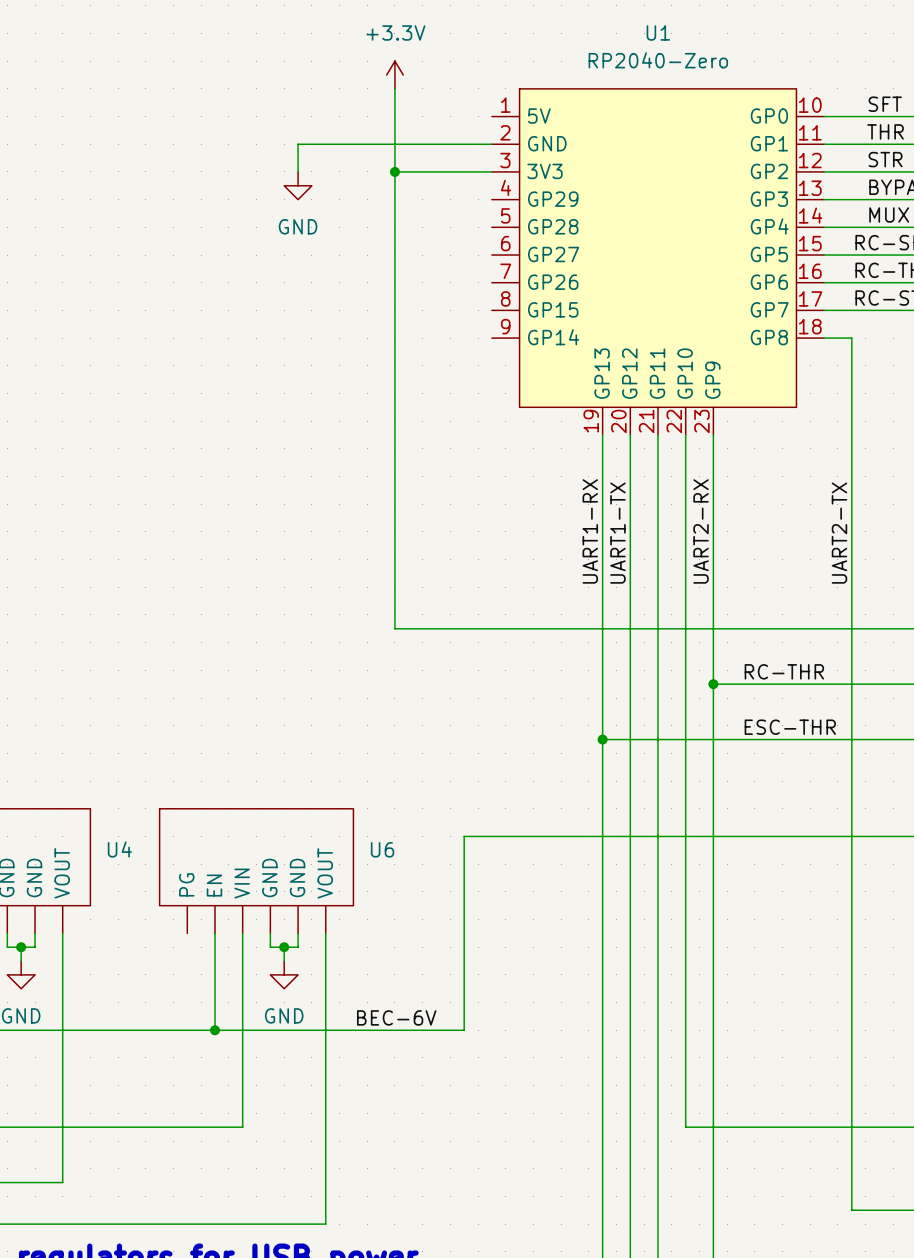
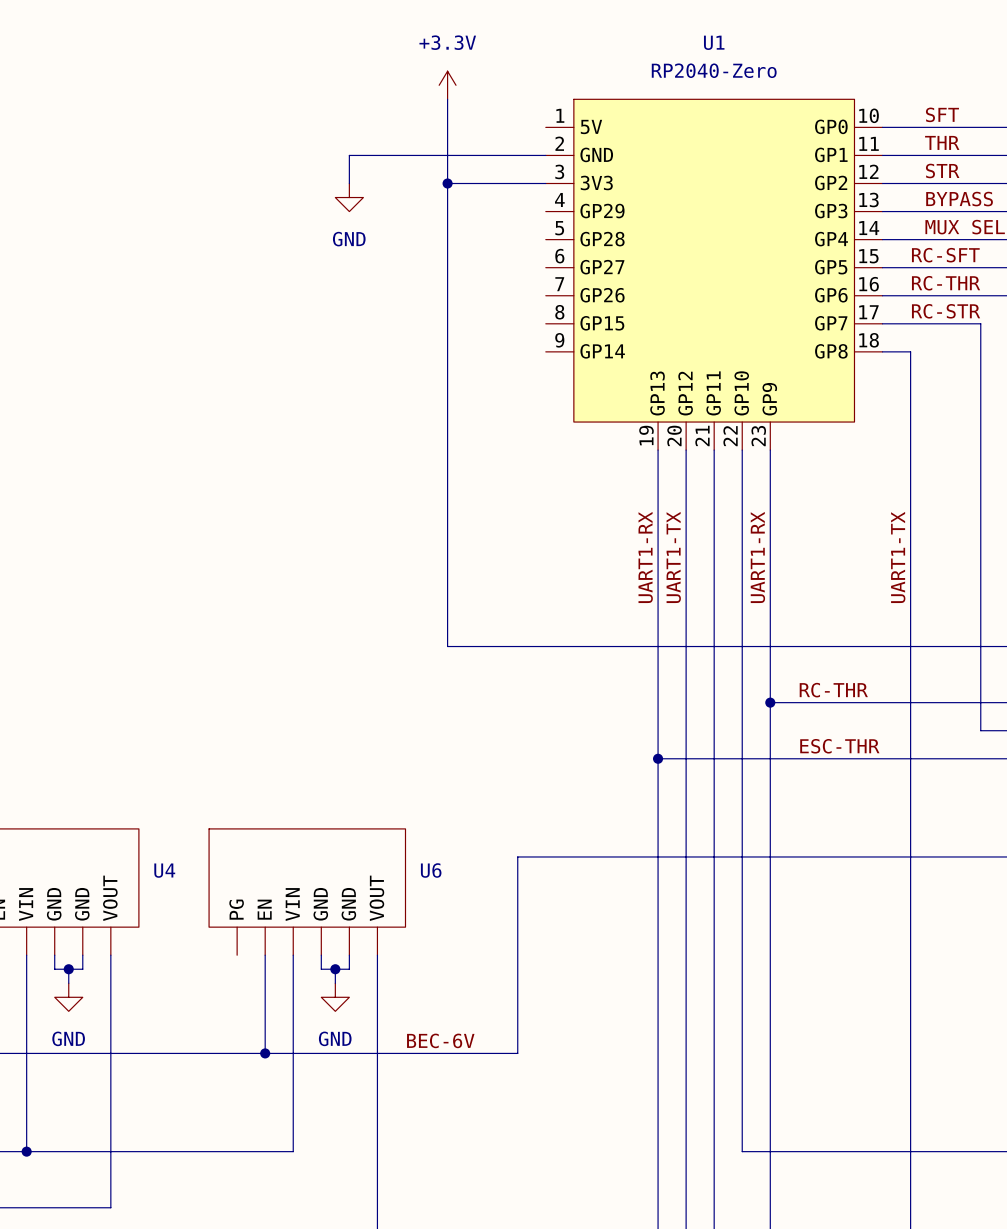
label: UART2-RX (701, 531) -> UART1-RX (757, 557)
label: UART2-TX (839, 533) -> UART1-TX (898, 557)

